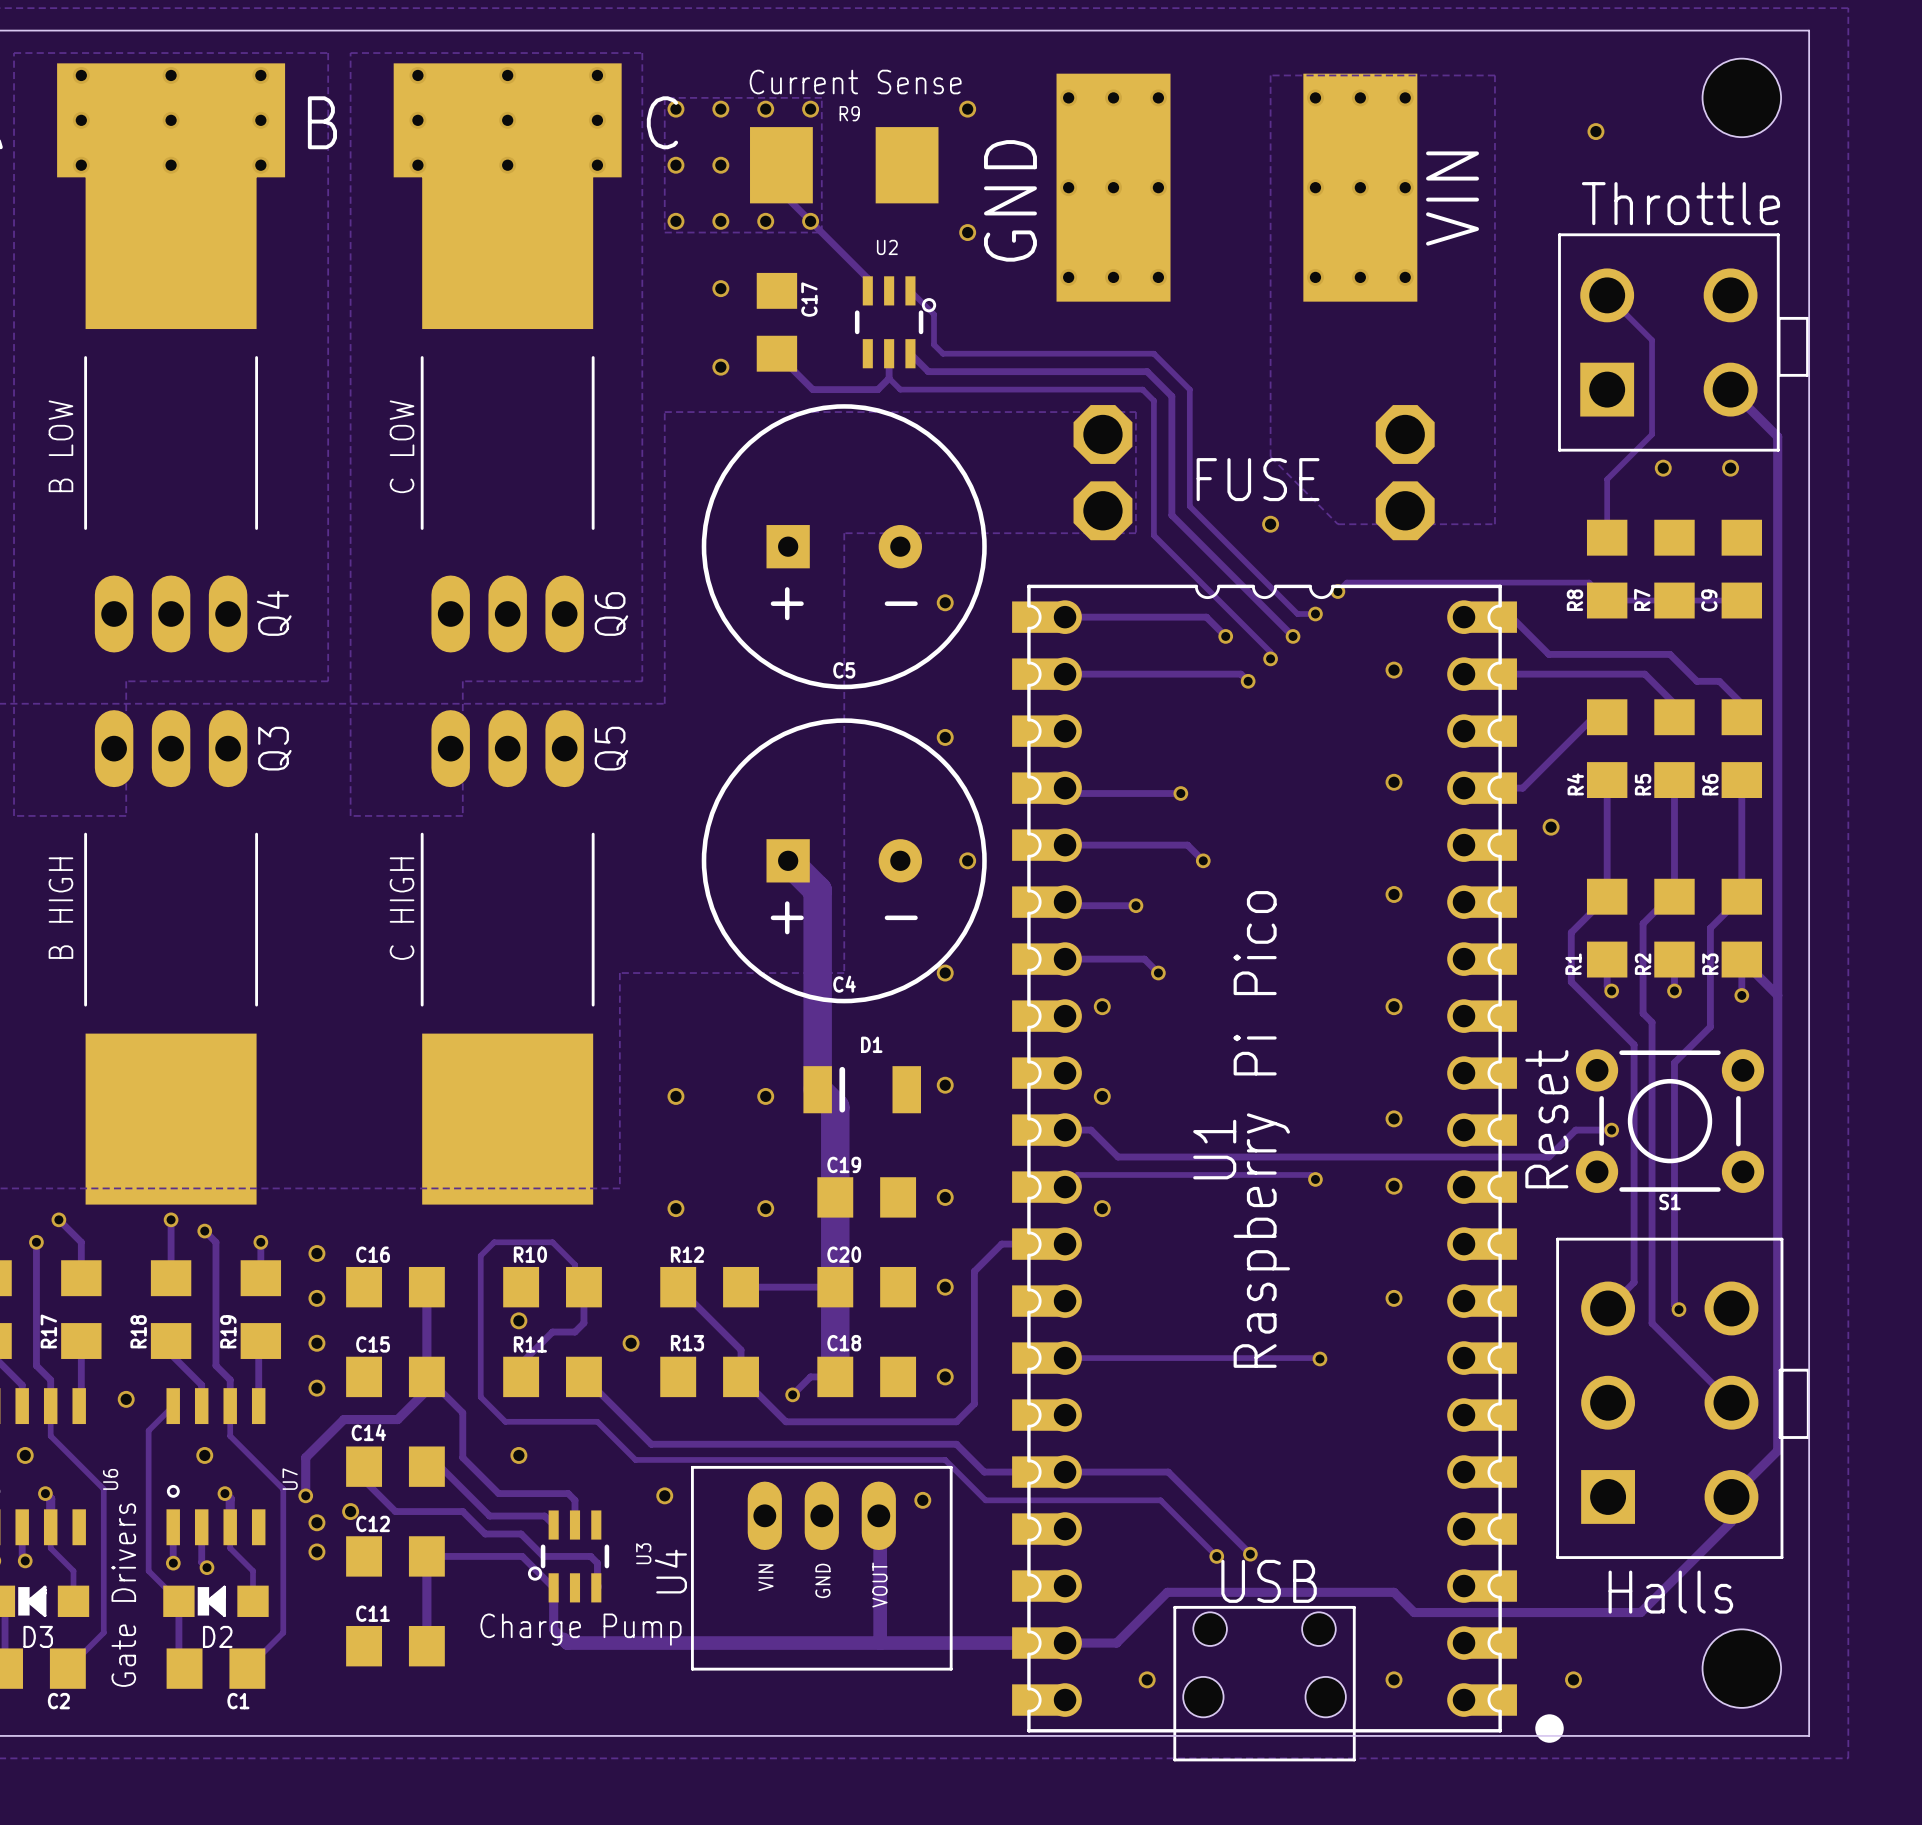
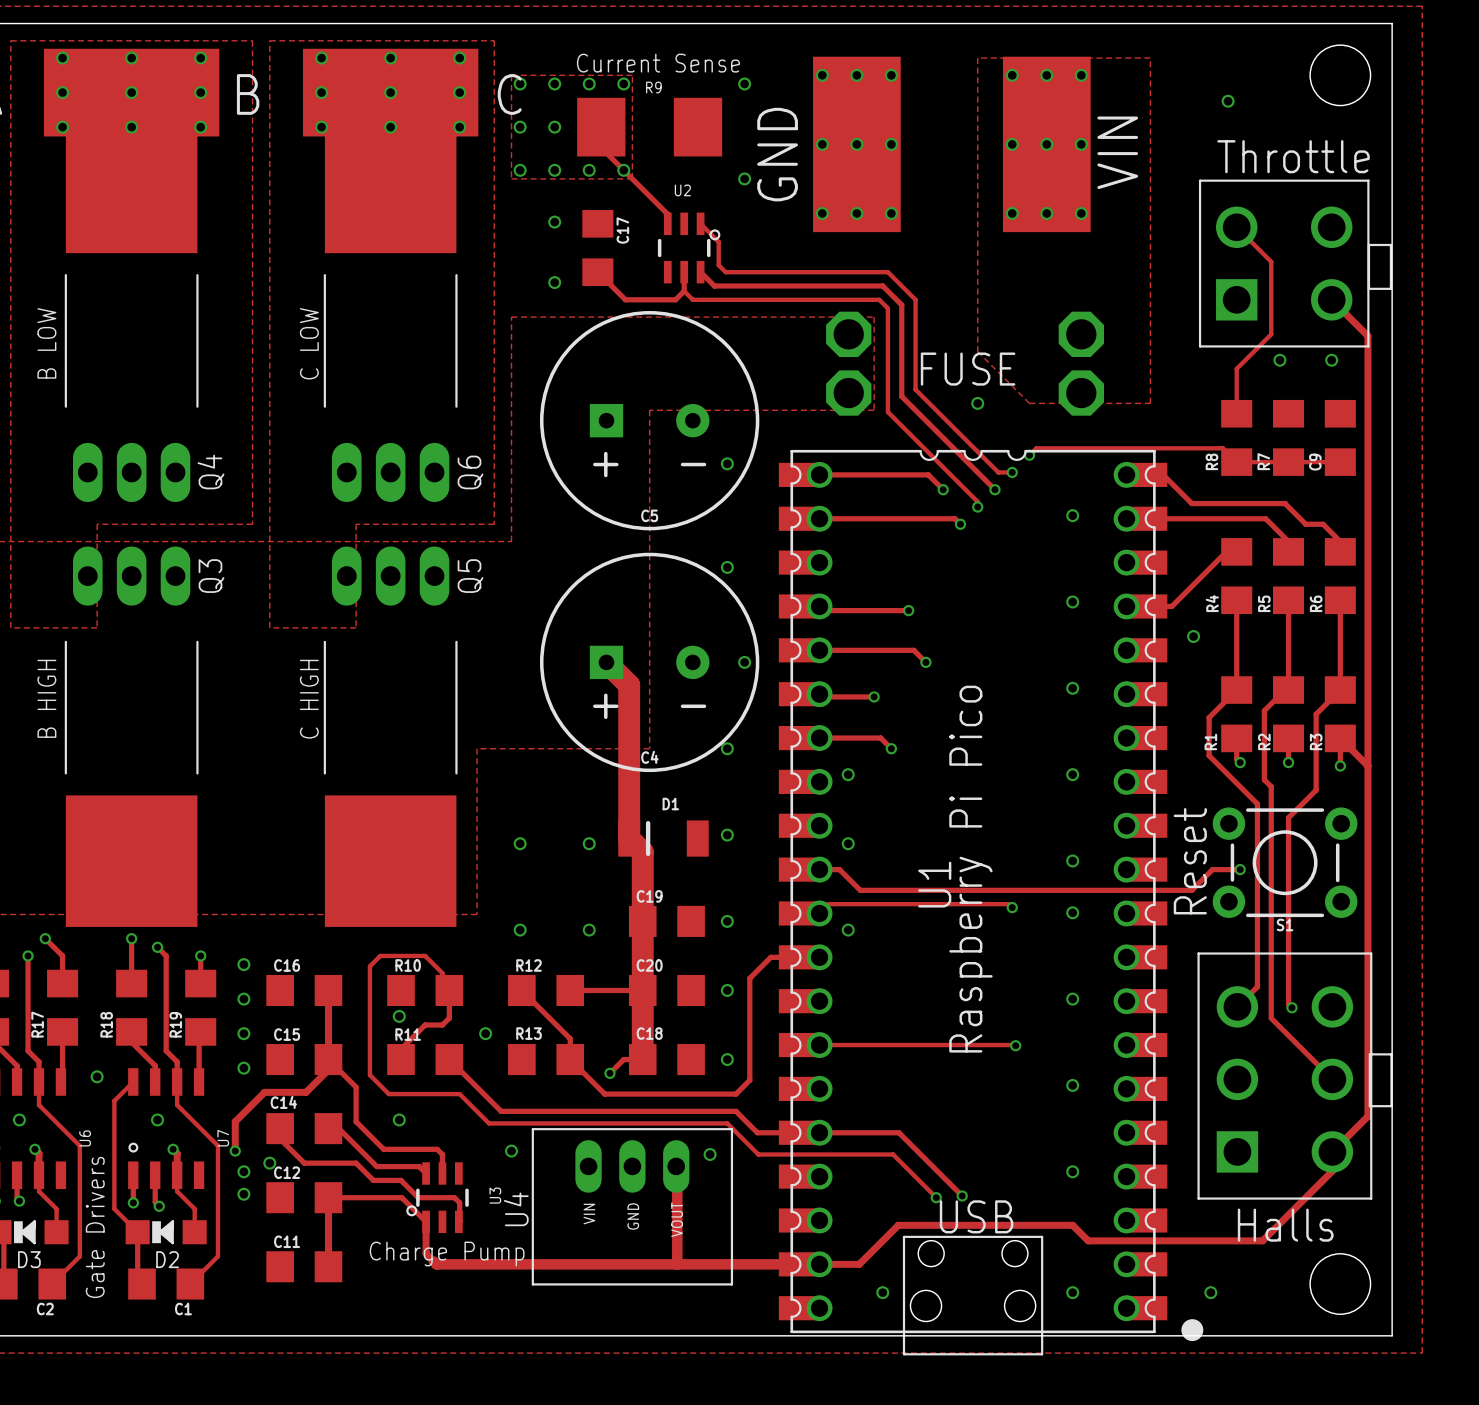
via: none -> (1072, 1085)
via: none -> (1072, 1171)

